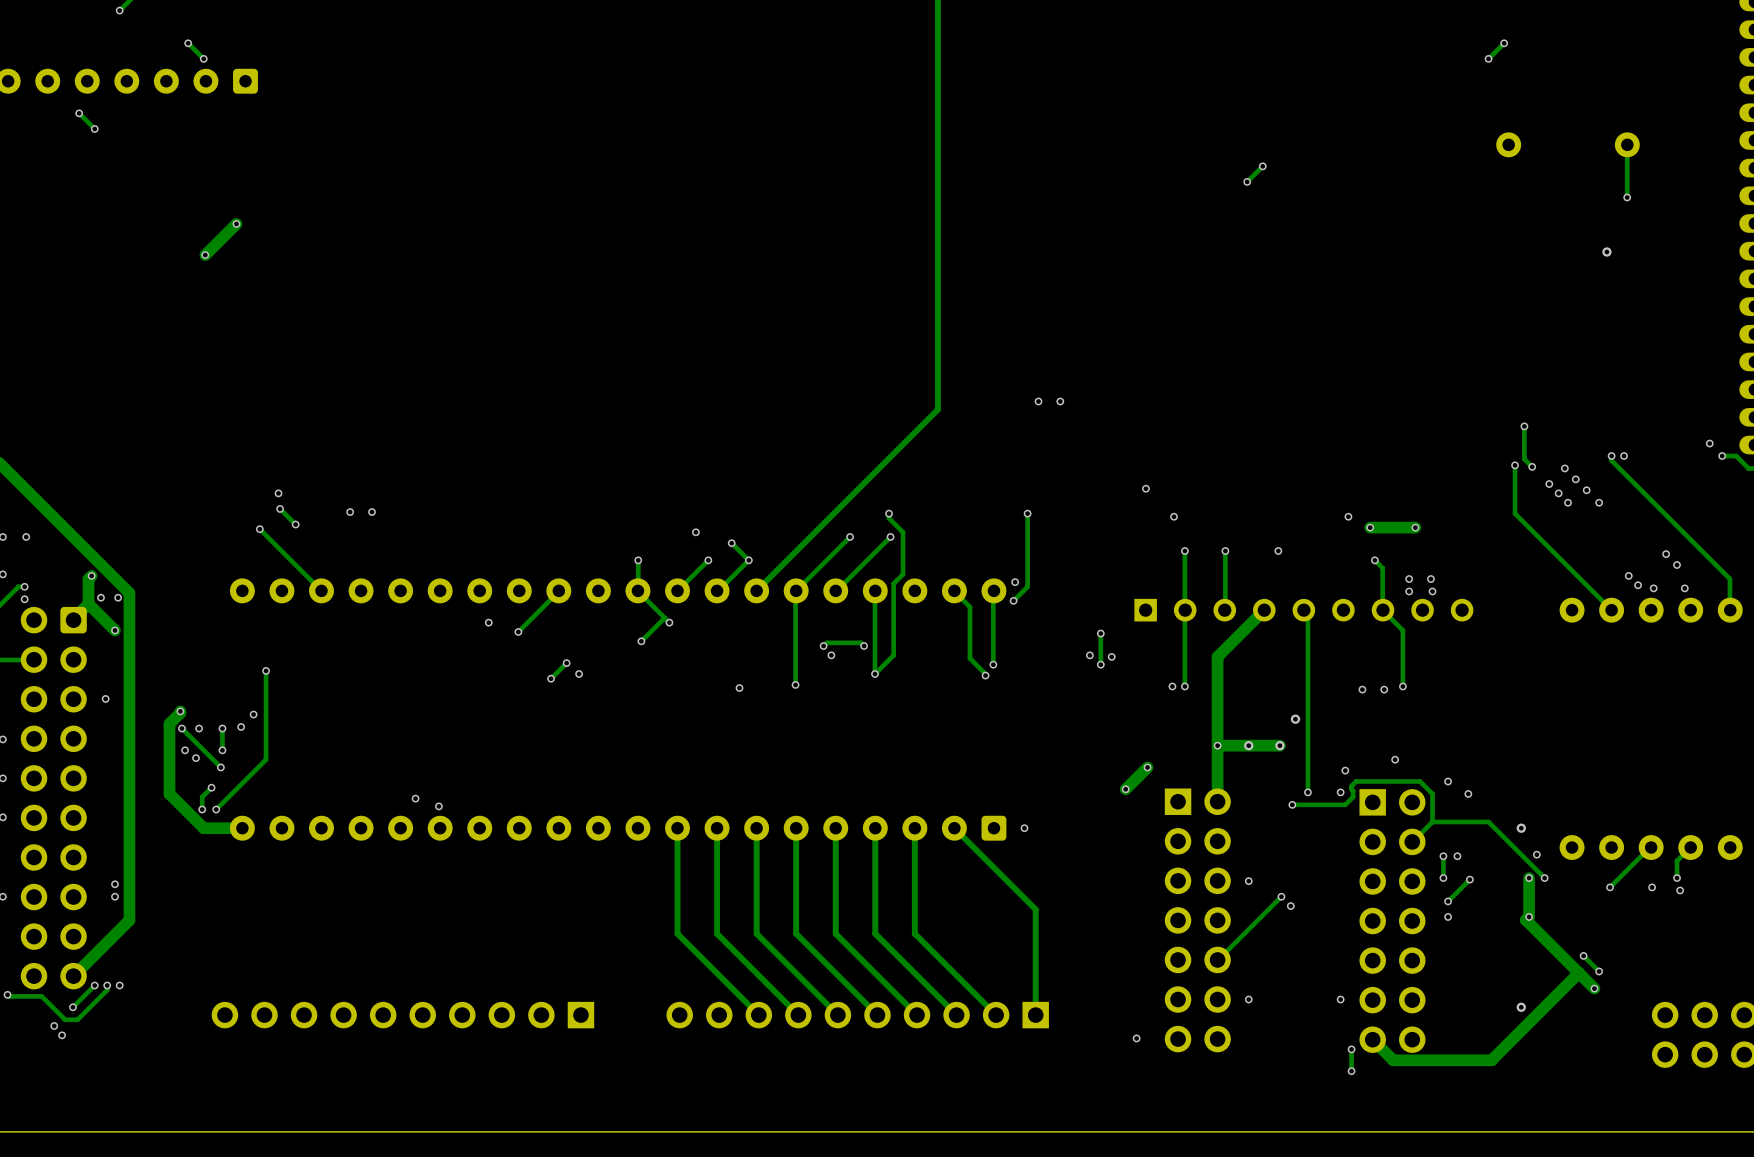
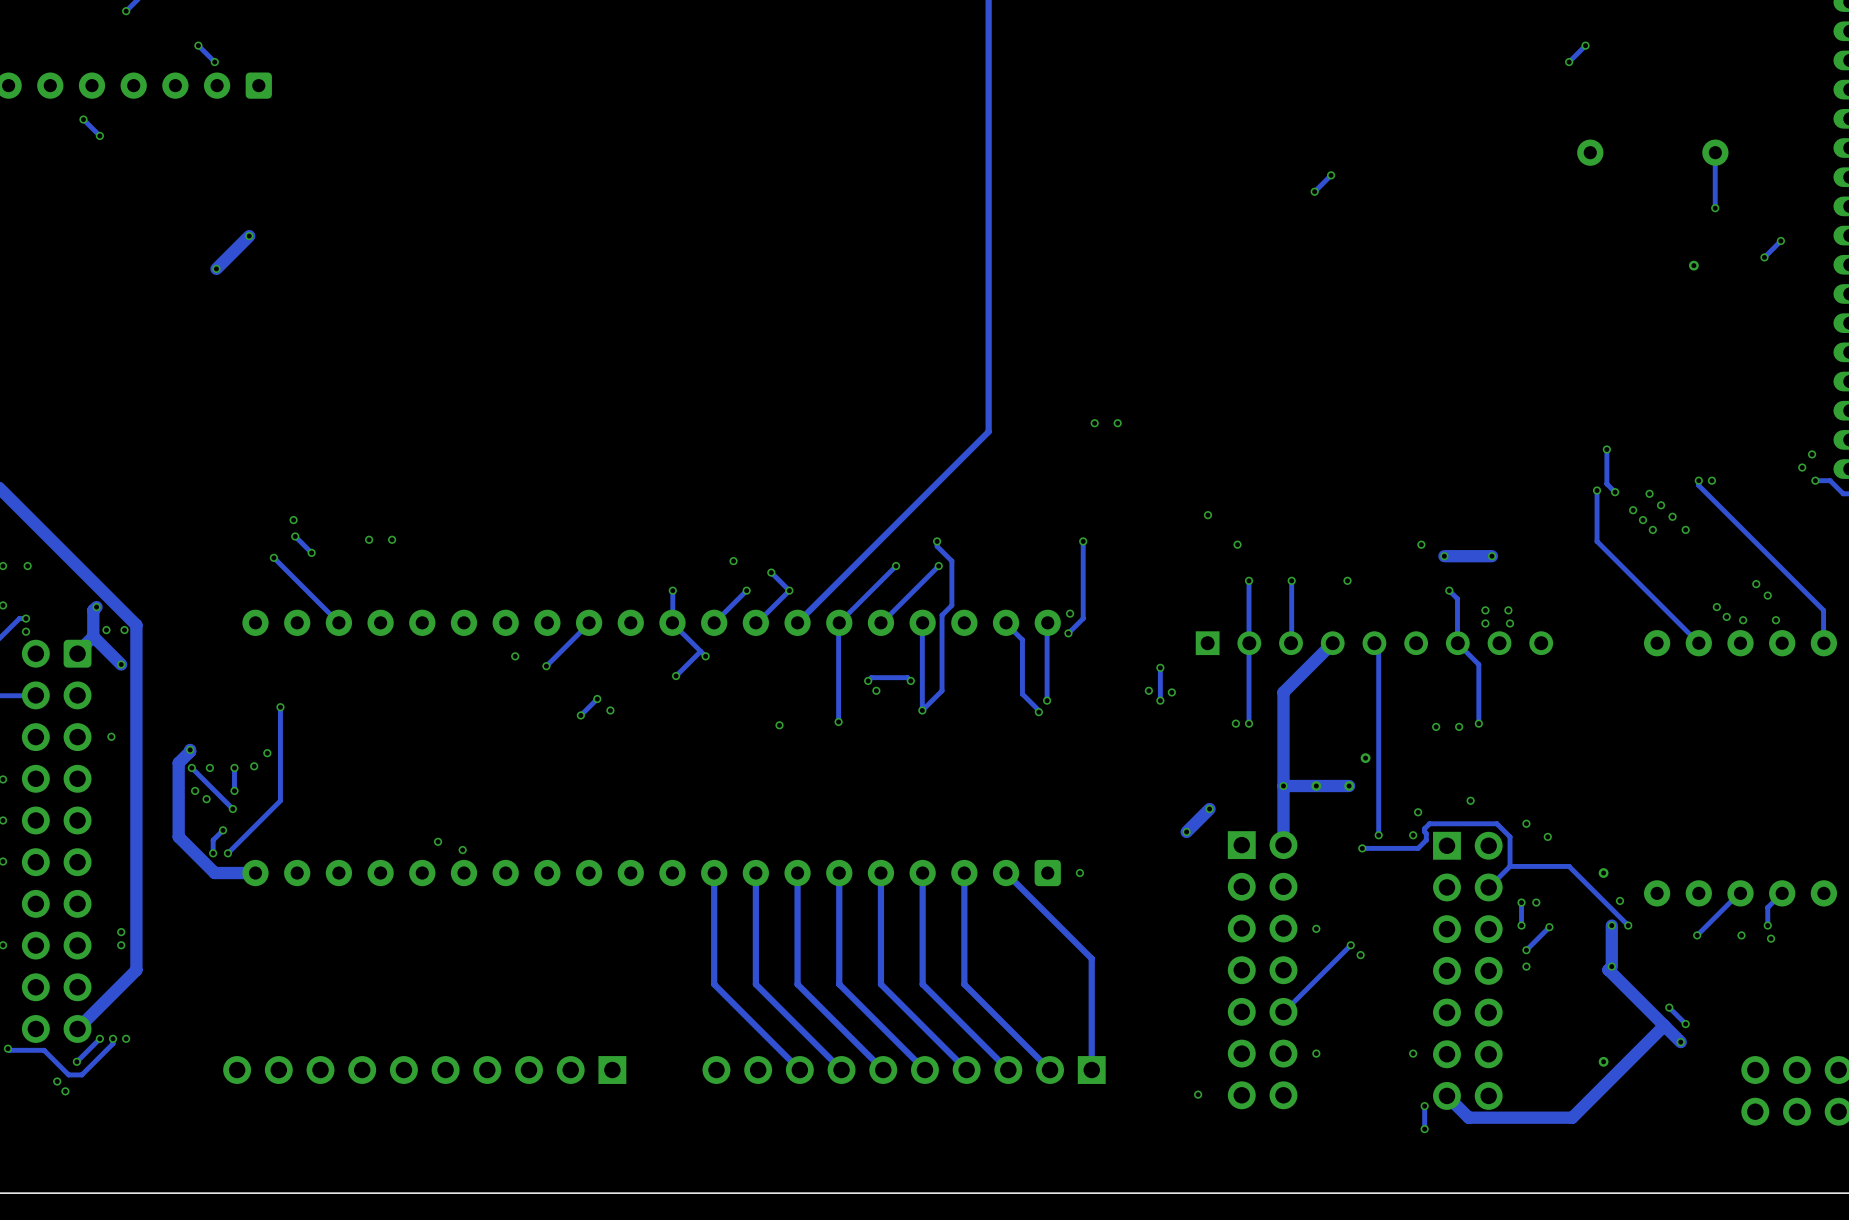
track: none -> (1780, 241) (1764, 257)
via: none -> (1780, 241)
via: none -> (1764, 257)
via: none -> (1812, 454)

